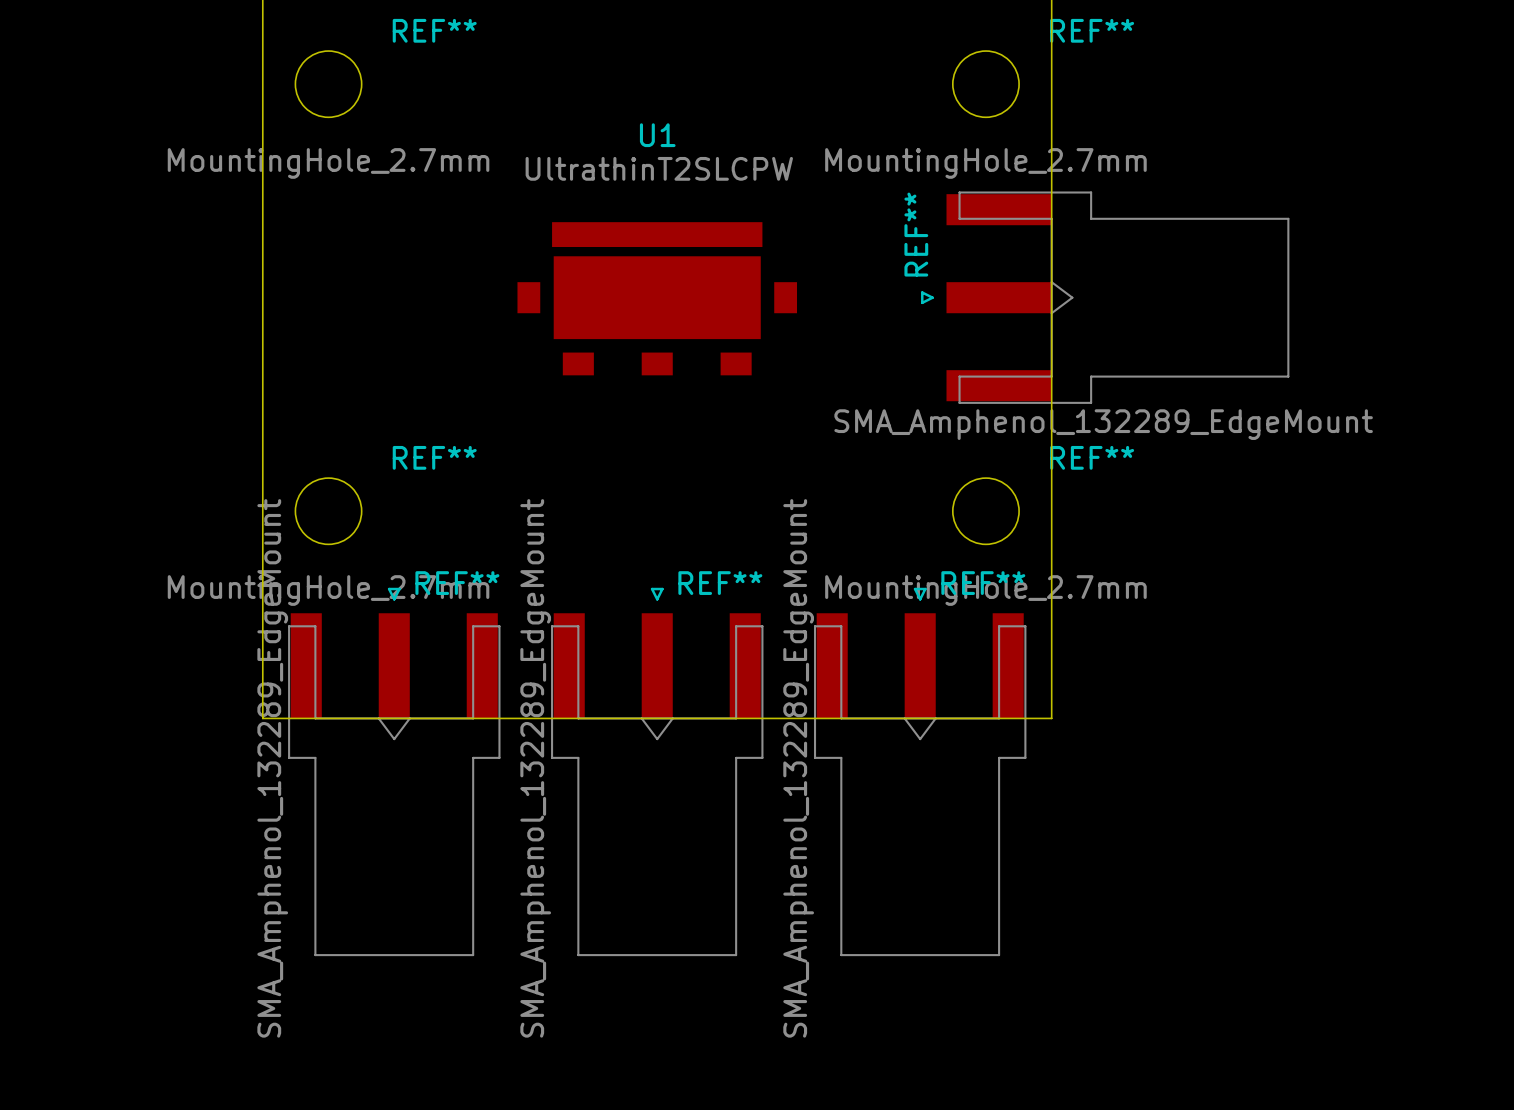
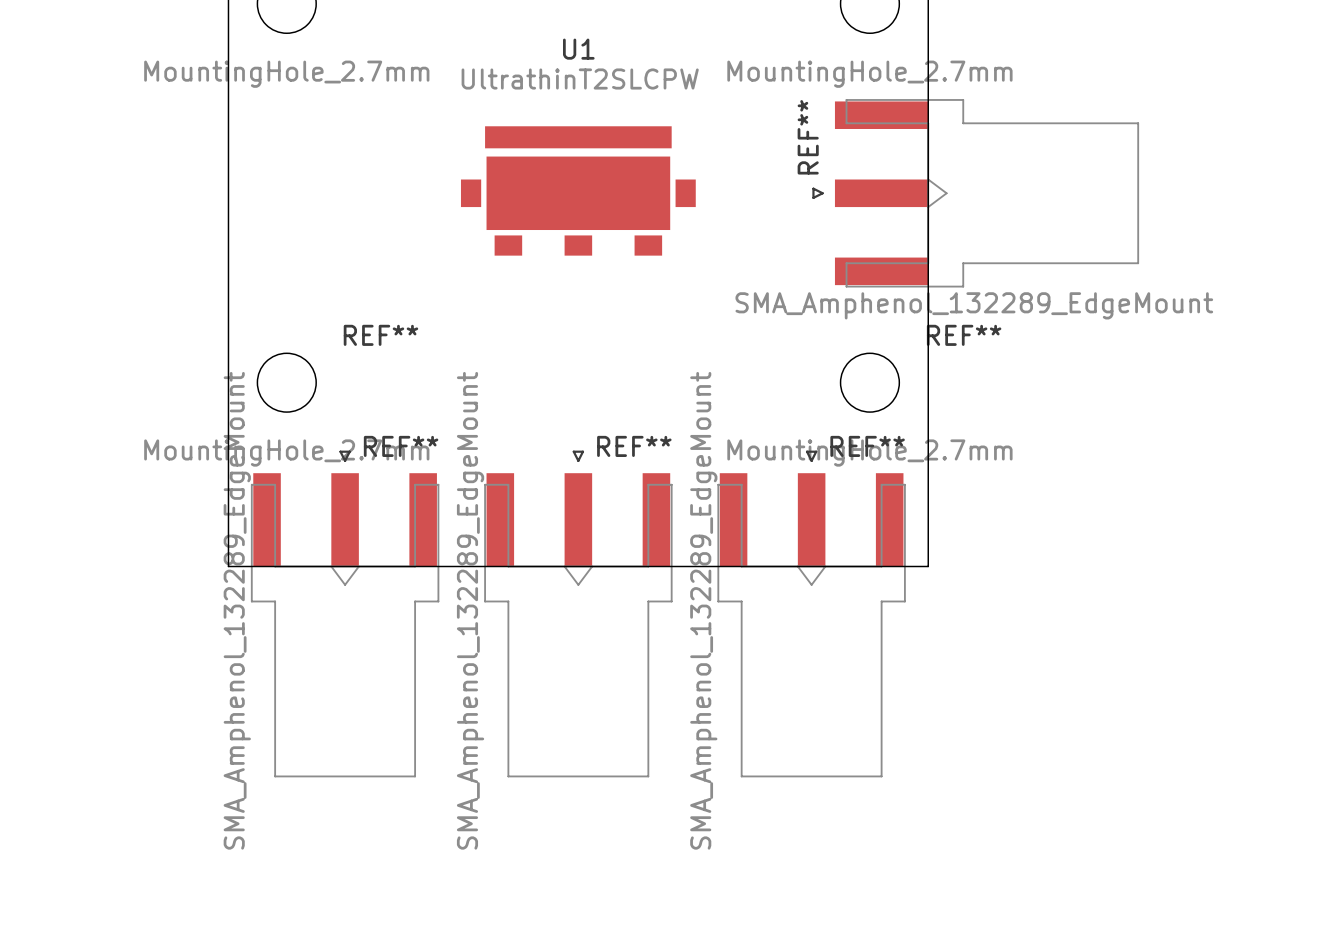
U1 footprint: [517, 222, 798, 376] -> [460, 126, 696, 256]

